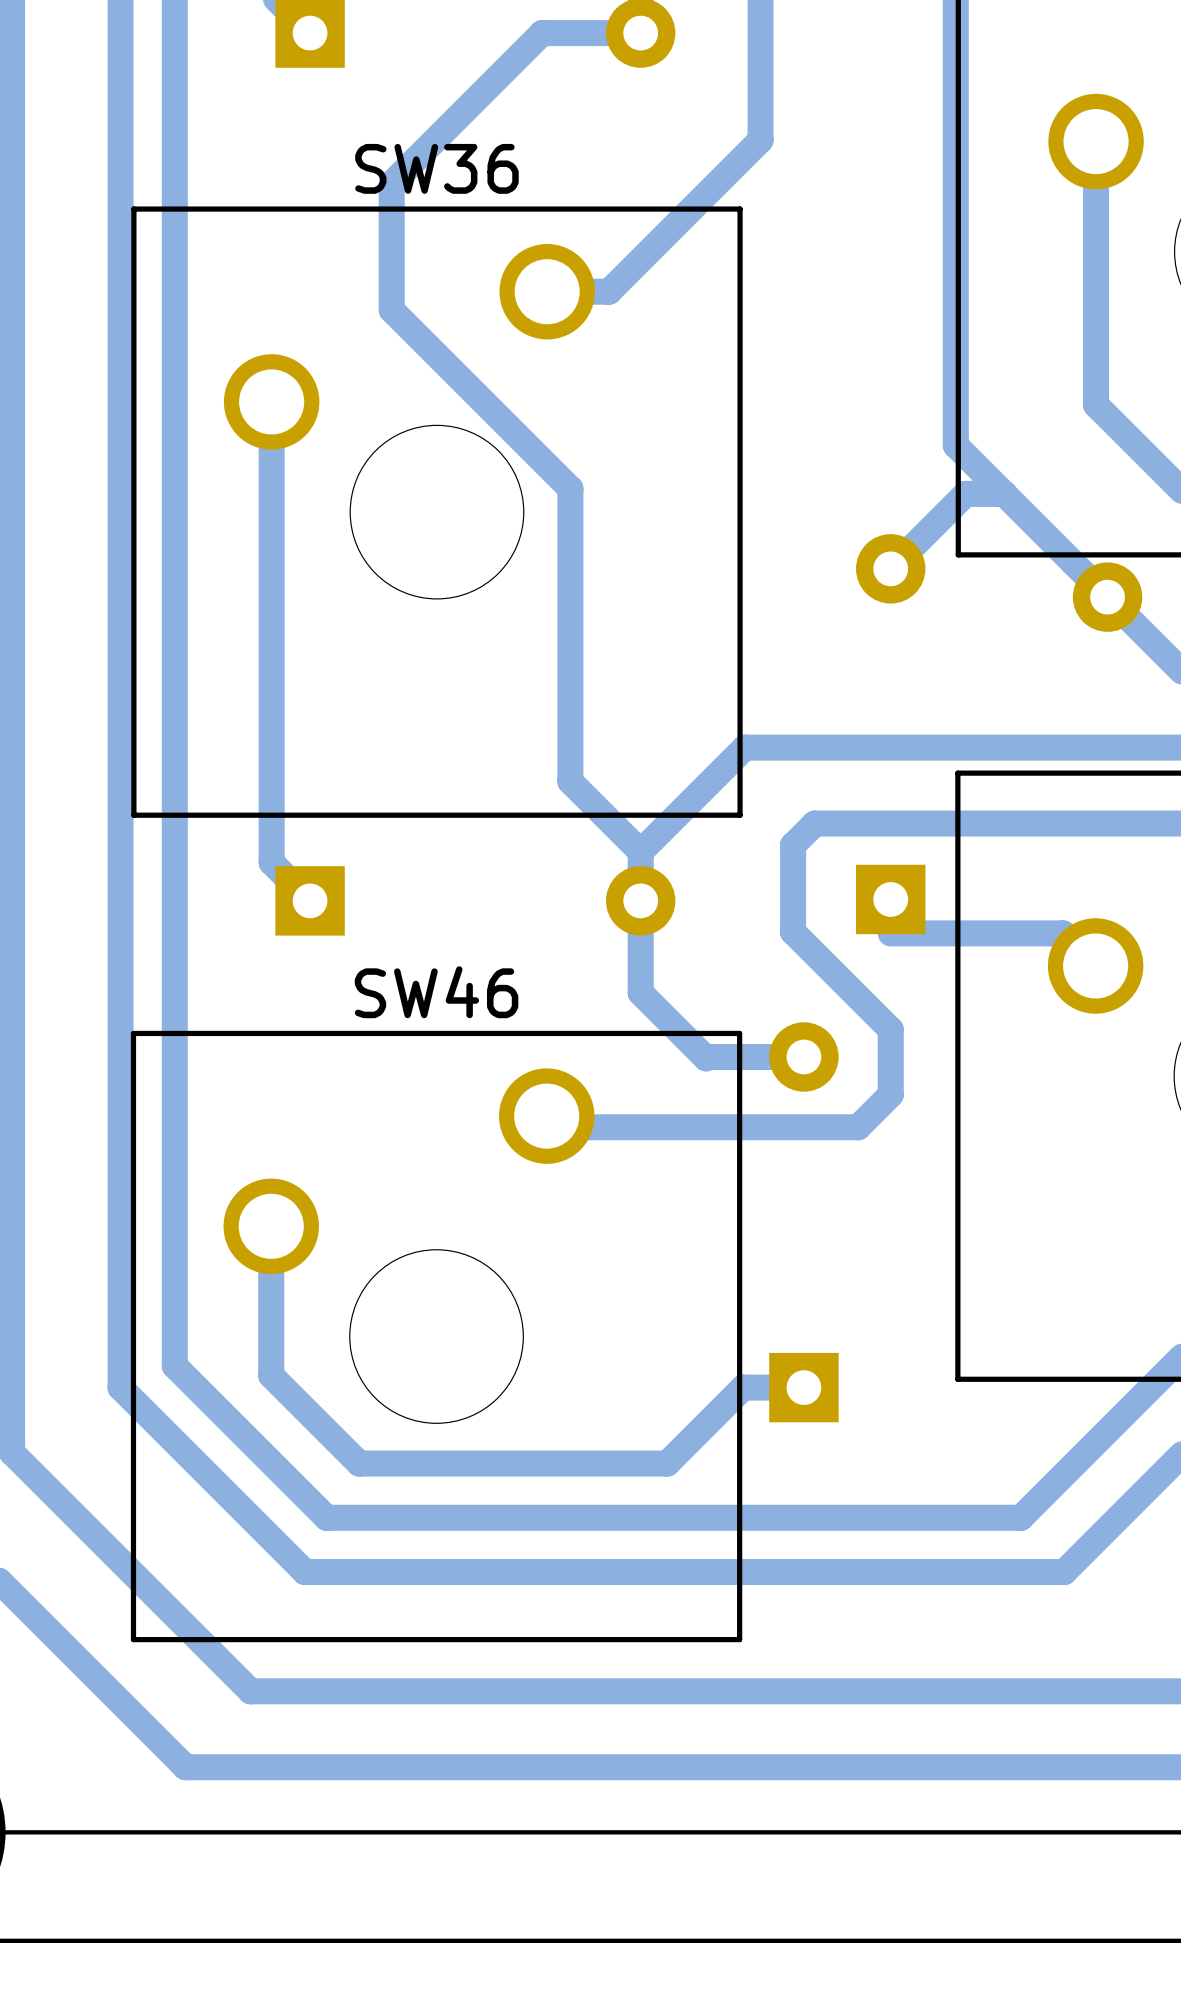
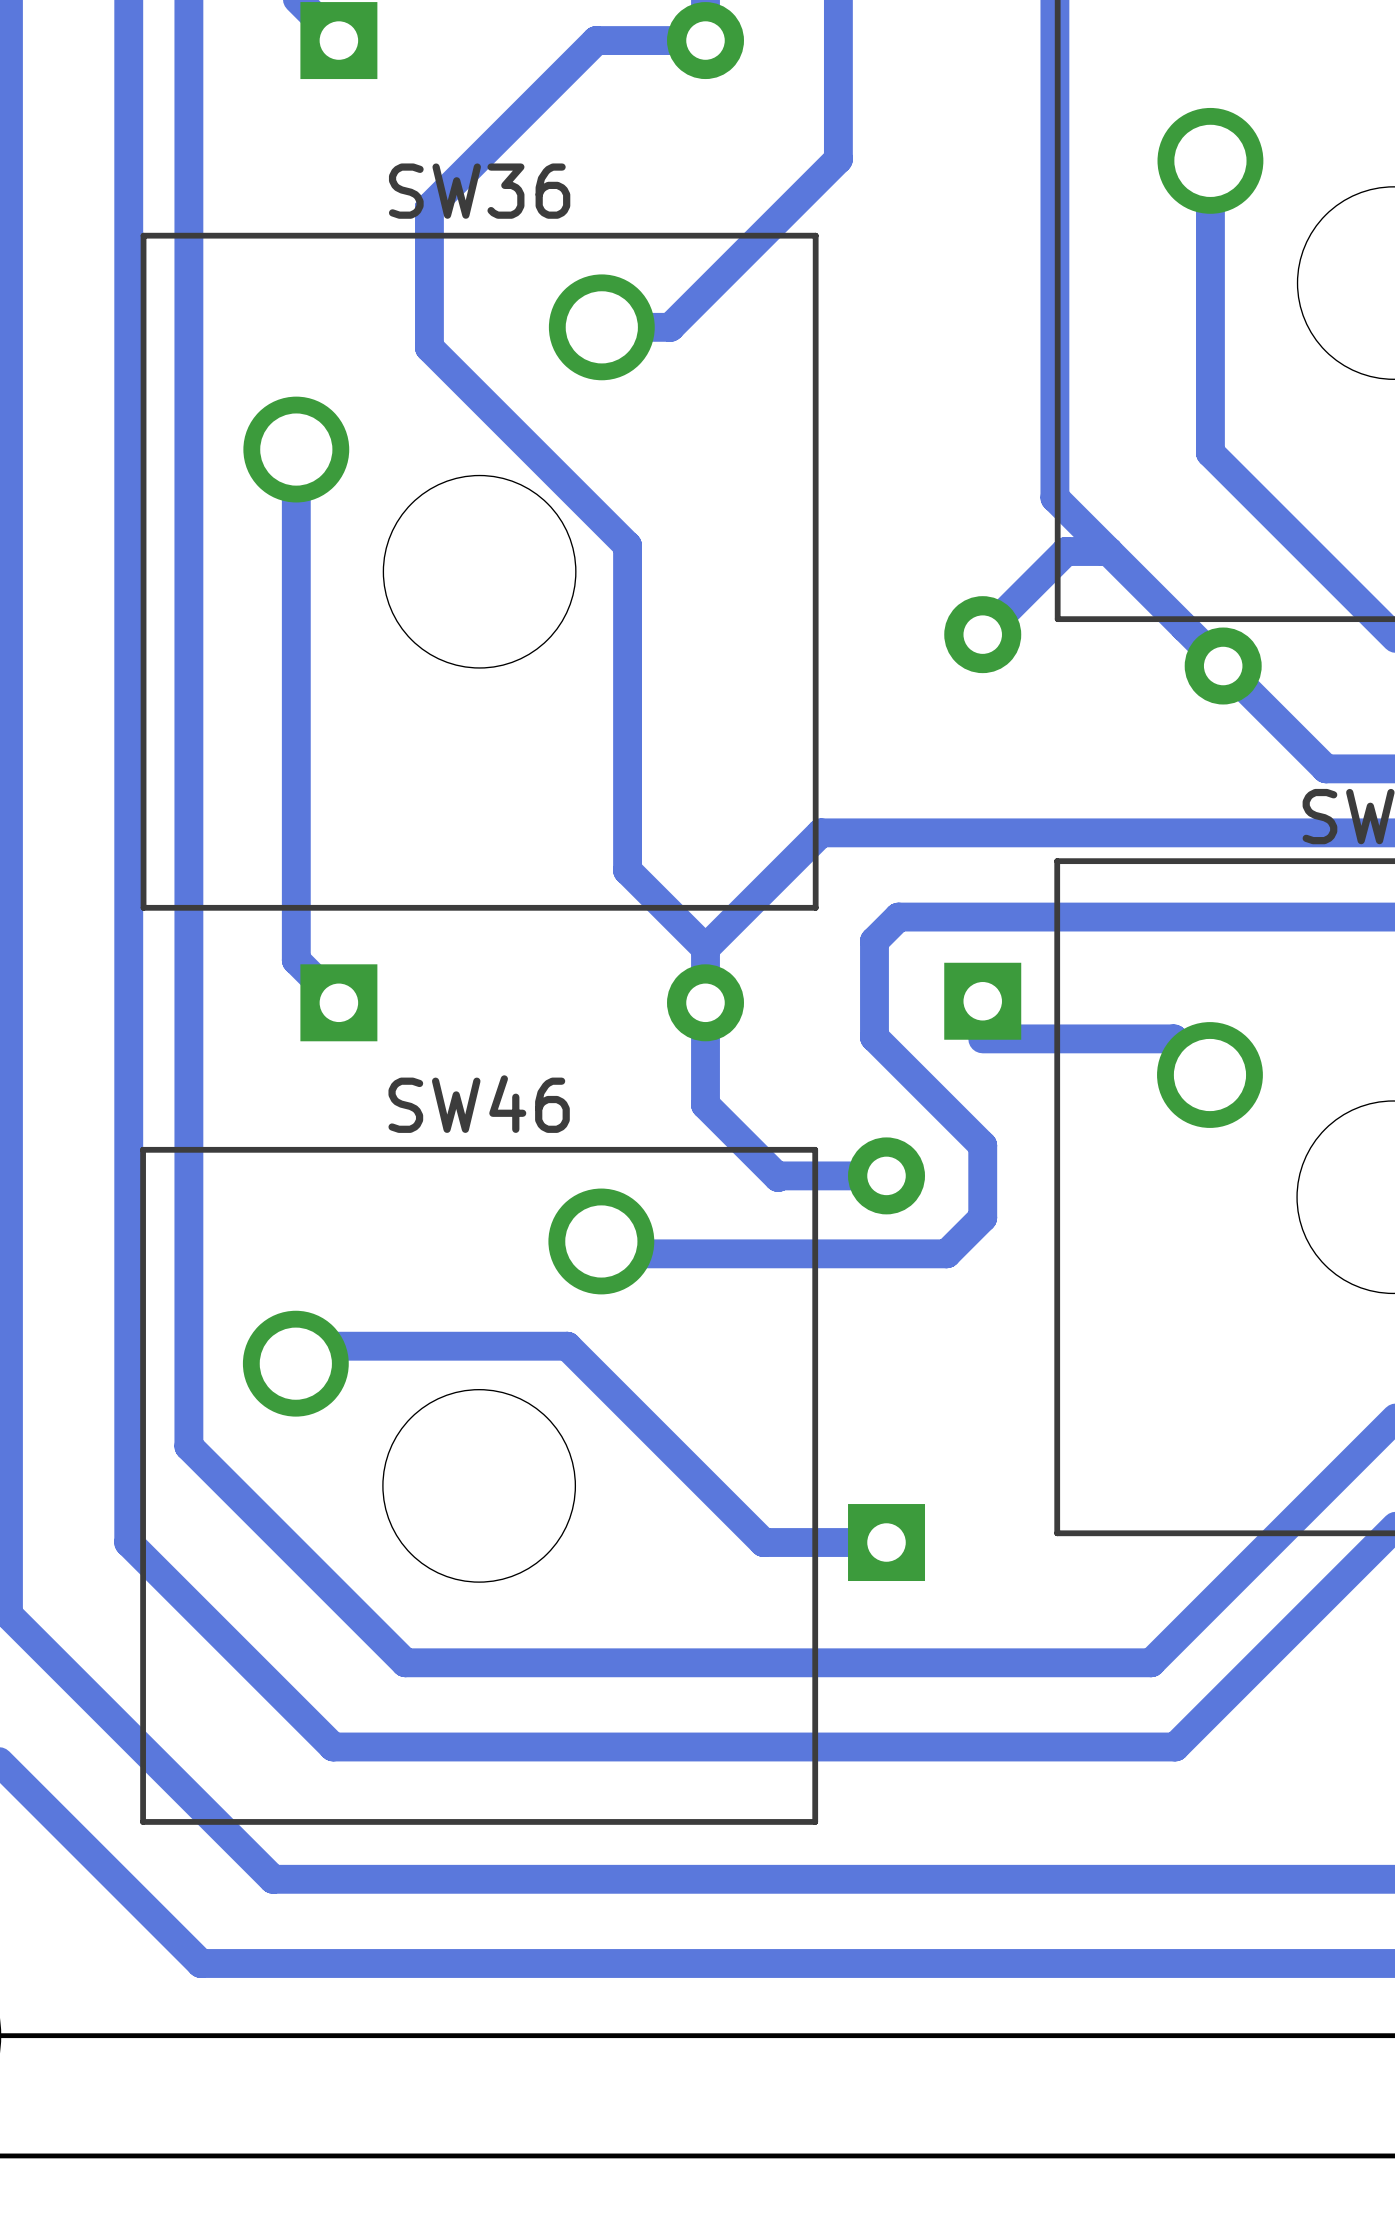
bottom track: (271, 1226) (271, 1375) (359, 1463) (667, 1463) (743, 1387) -> (309, 1350) (313, 1346) (567, 1346) (763, 1542) (819, 1542)
bottom track: (174, 1300) (174, 1365) (326, 1517) (1020, 1517) (1042, 1496) -> (188, 1446) (405, 1662) (1151, 1662)

